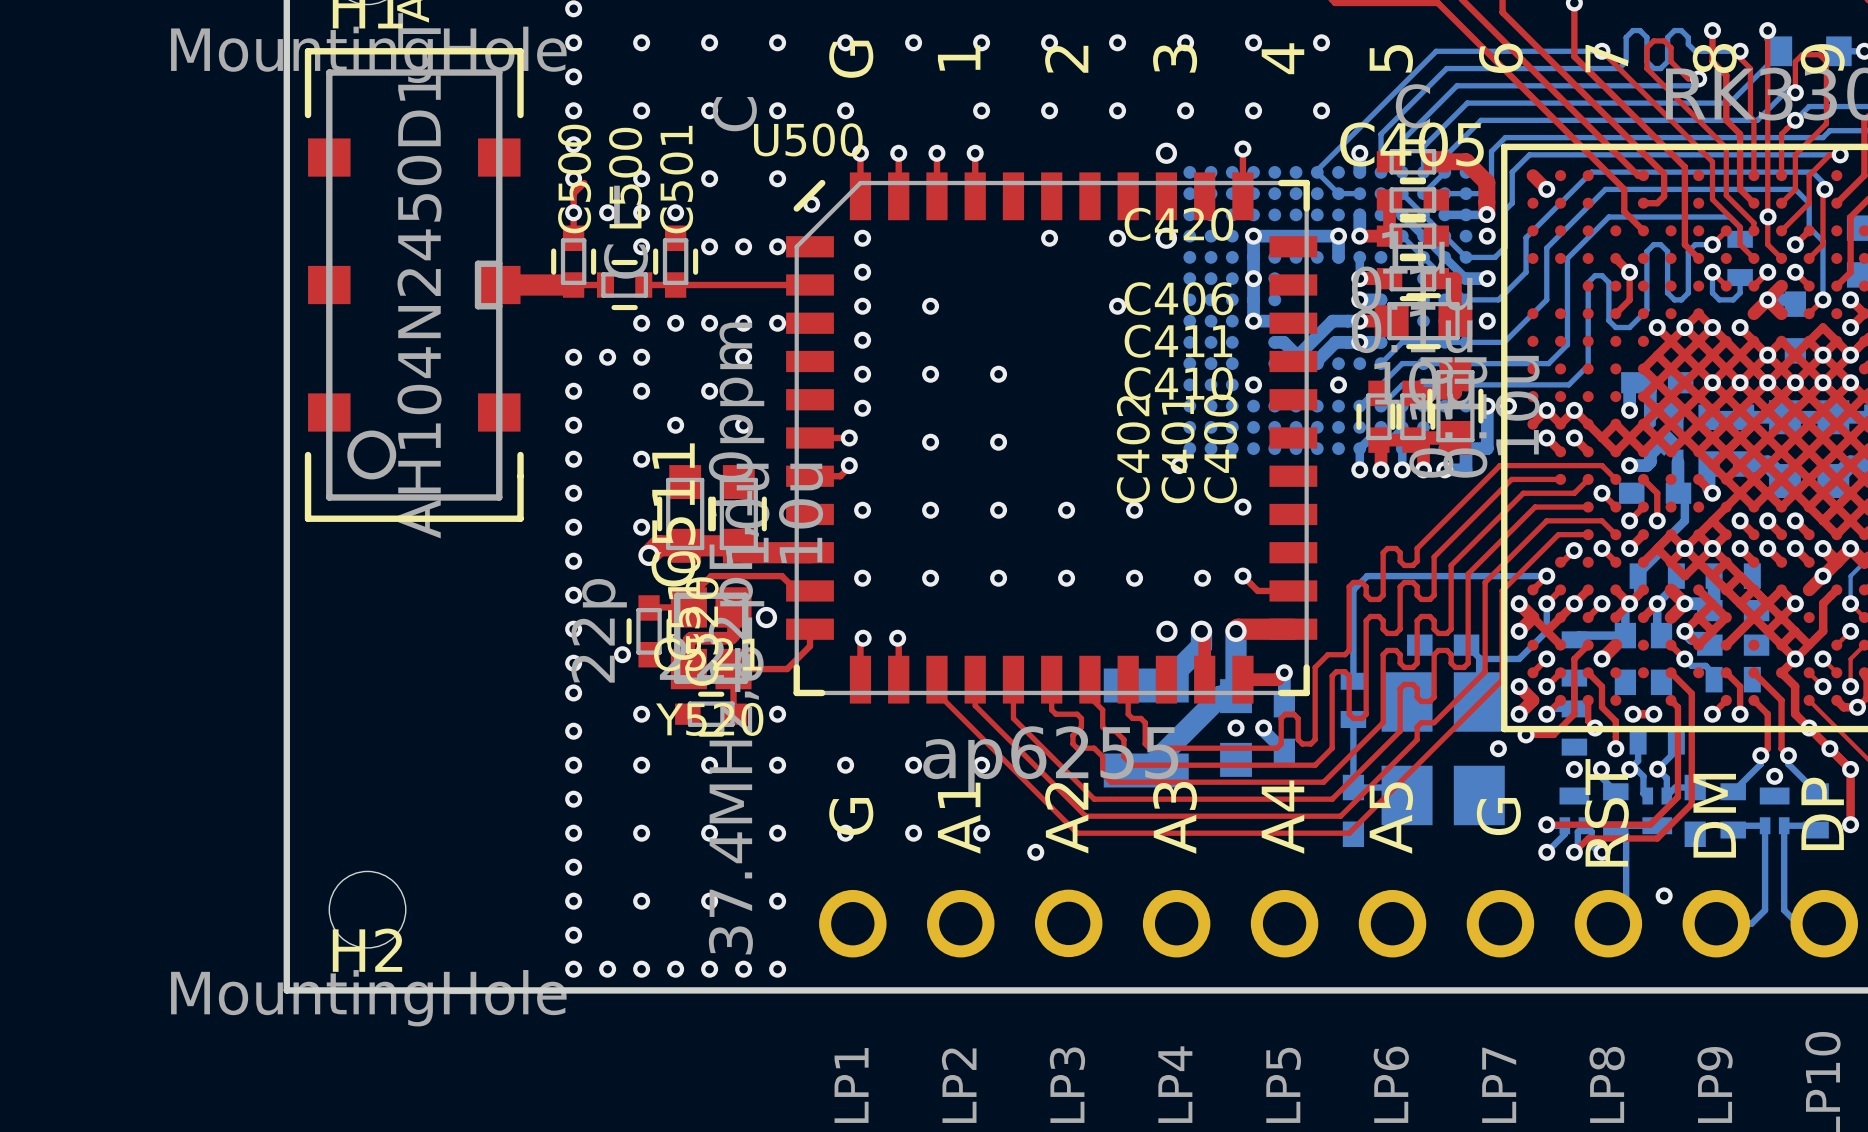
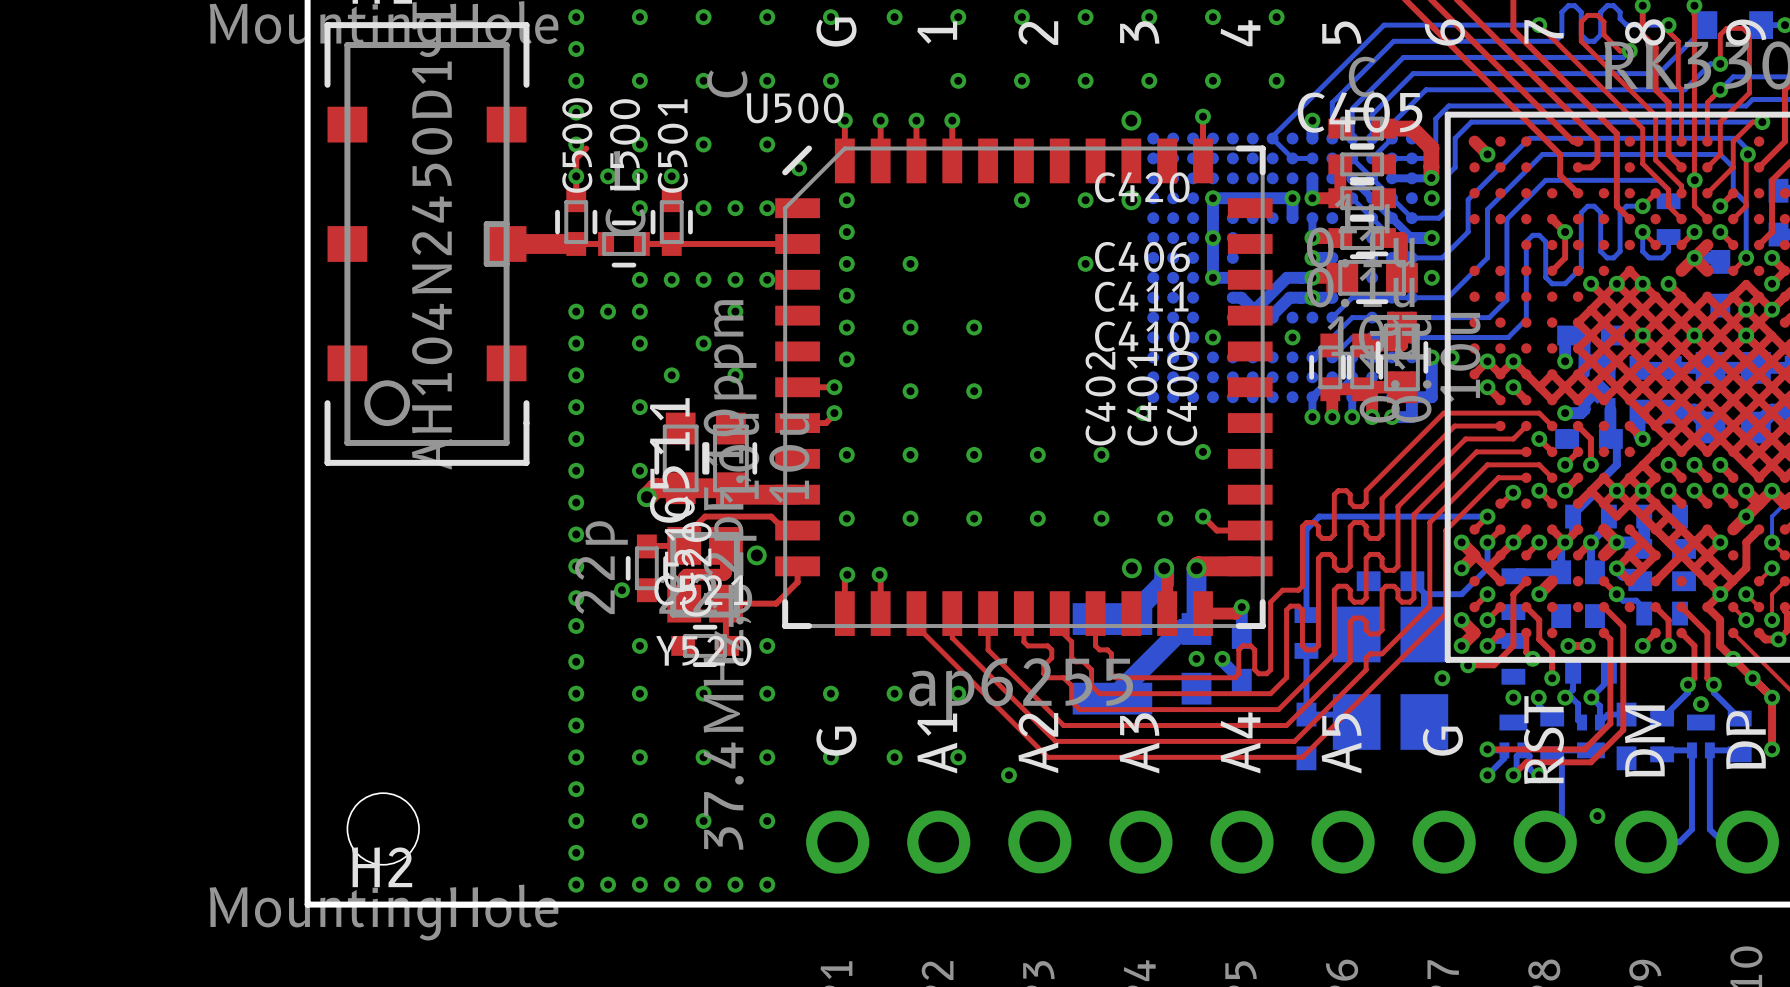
via: (1767, 355) -> none
via: (1740, 382) -> none
via: (1795, 382) -> none
via: (1850, 382) -> none

